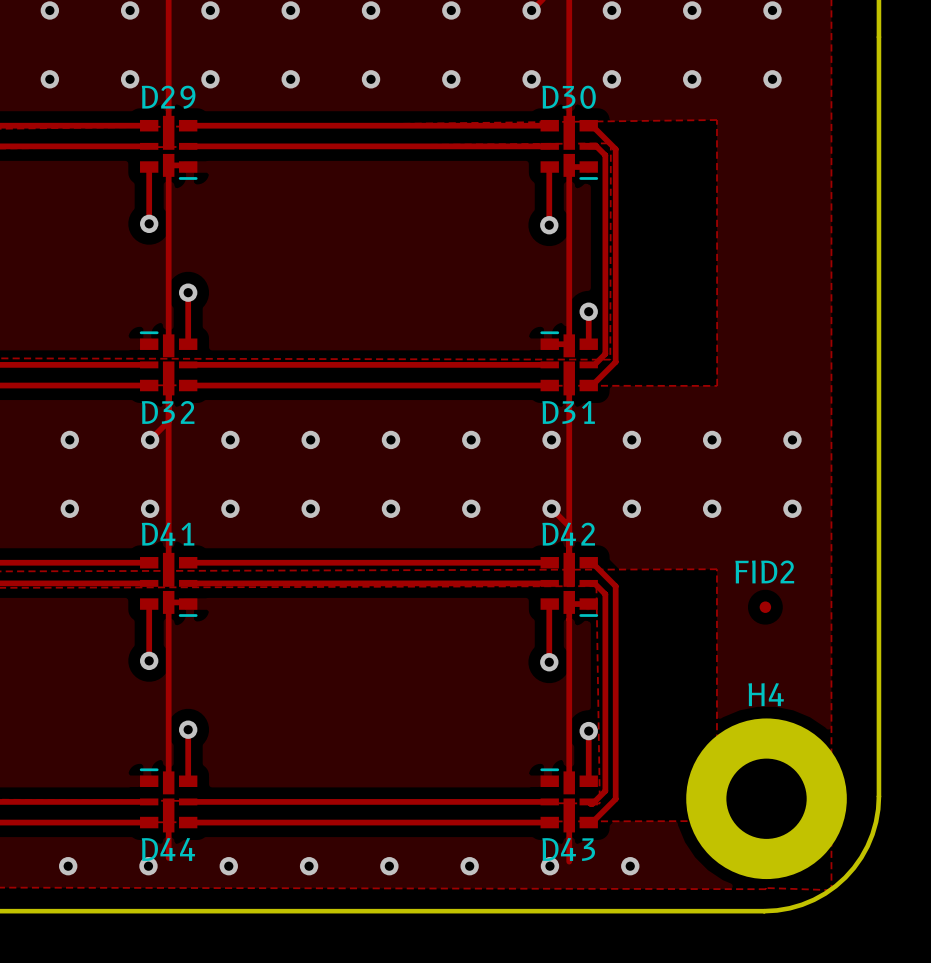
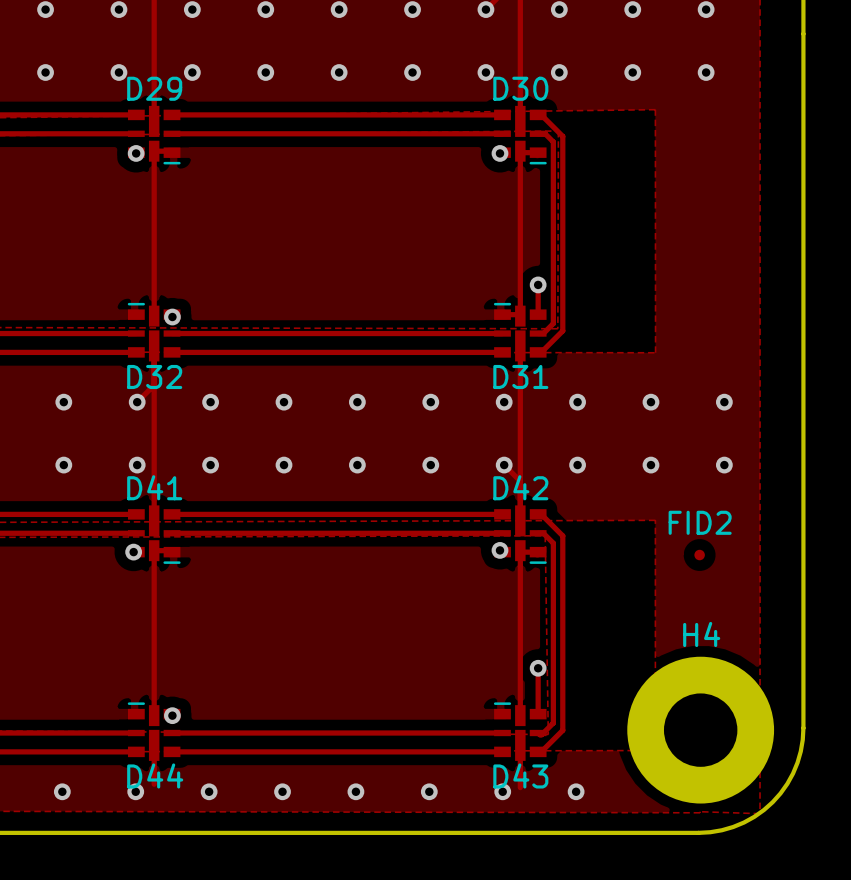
track: (149, 167) (149, 223) -> none
track: (549, 168) (549, 225) -> none
via position: (149, 223) -> (136, 153)
via position: (549, 225) -> (499, 153)
track: (188, 292) (188, 344) -> none
via position: (188, 292) -> (172, 317)
track: (149, 604) (149, 660) -> none
track: (549, 605) (549, 662) -> none
via position: (149, 660) -> (133, 552)
via position: (549, 662) -> (499, 550)
track: (188, 729) (188, 781) -> none
via position: (188, 729) -> (172, 715)

